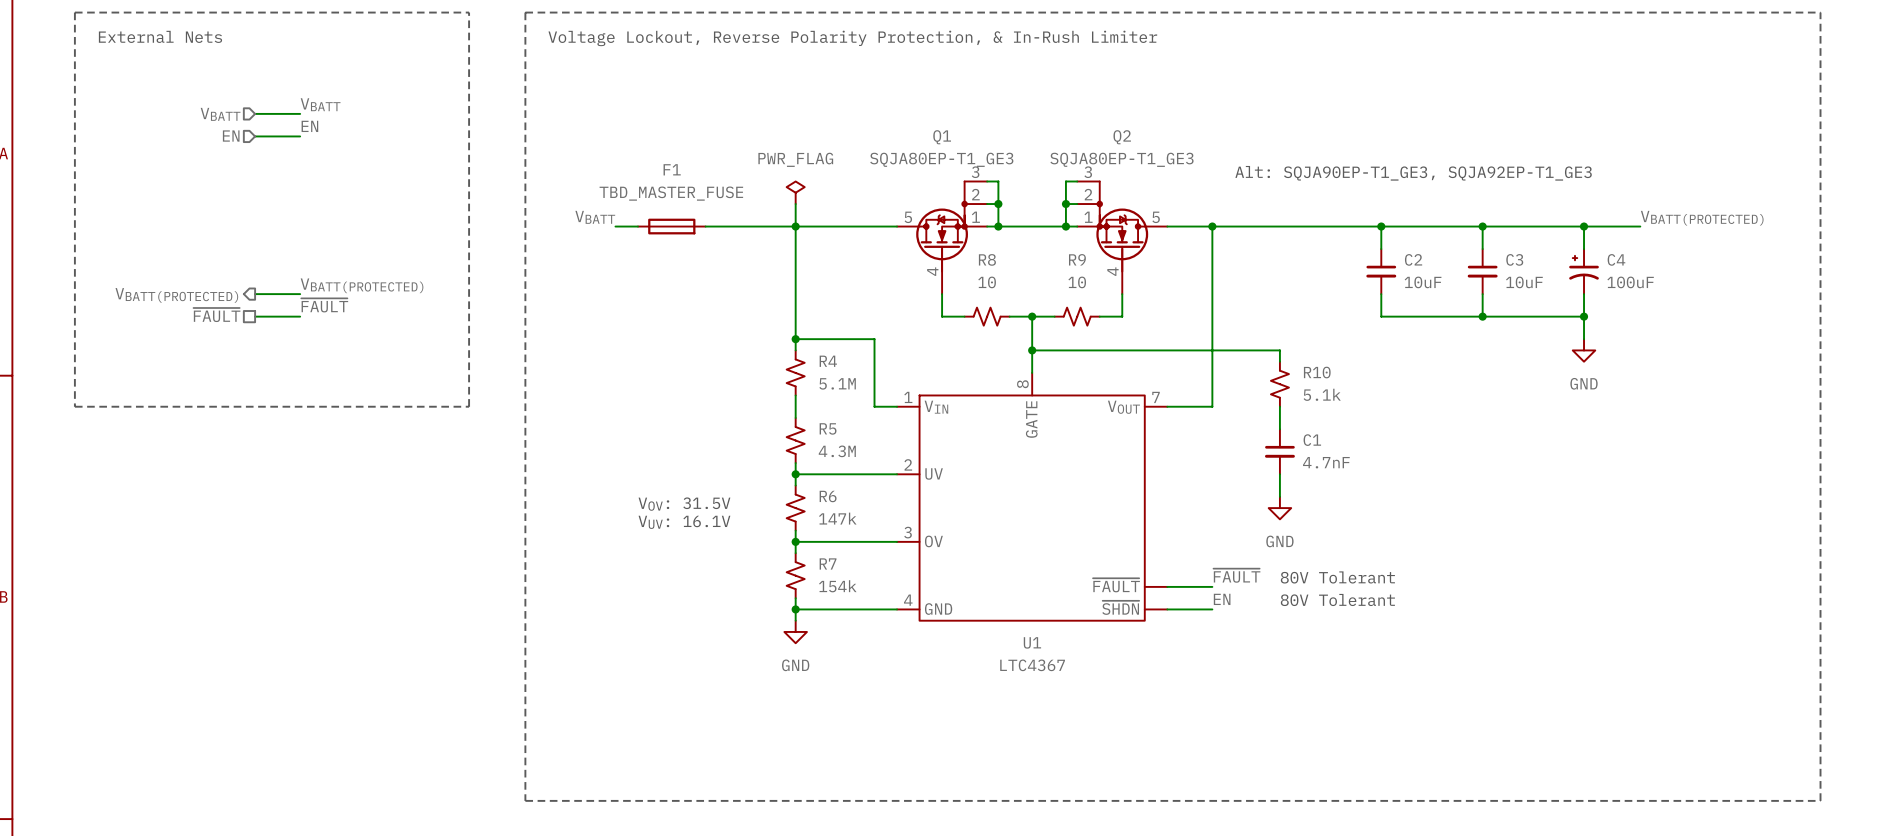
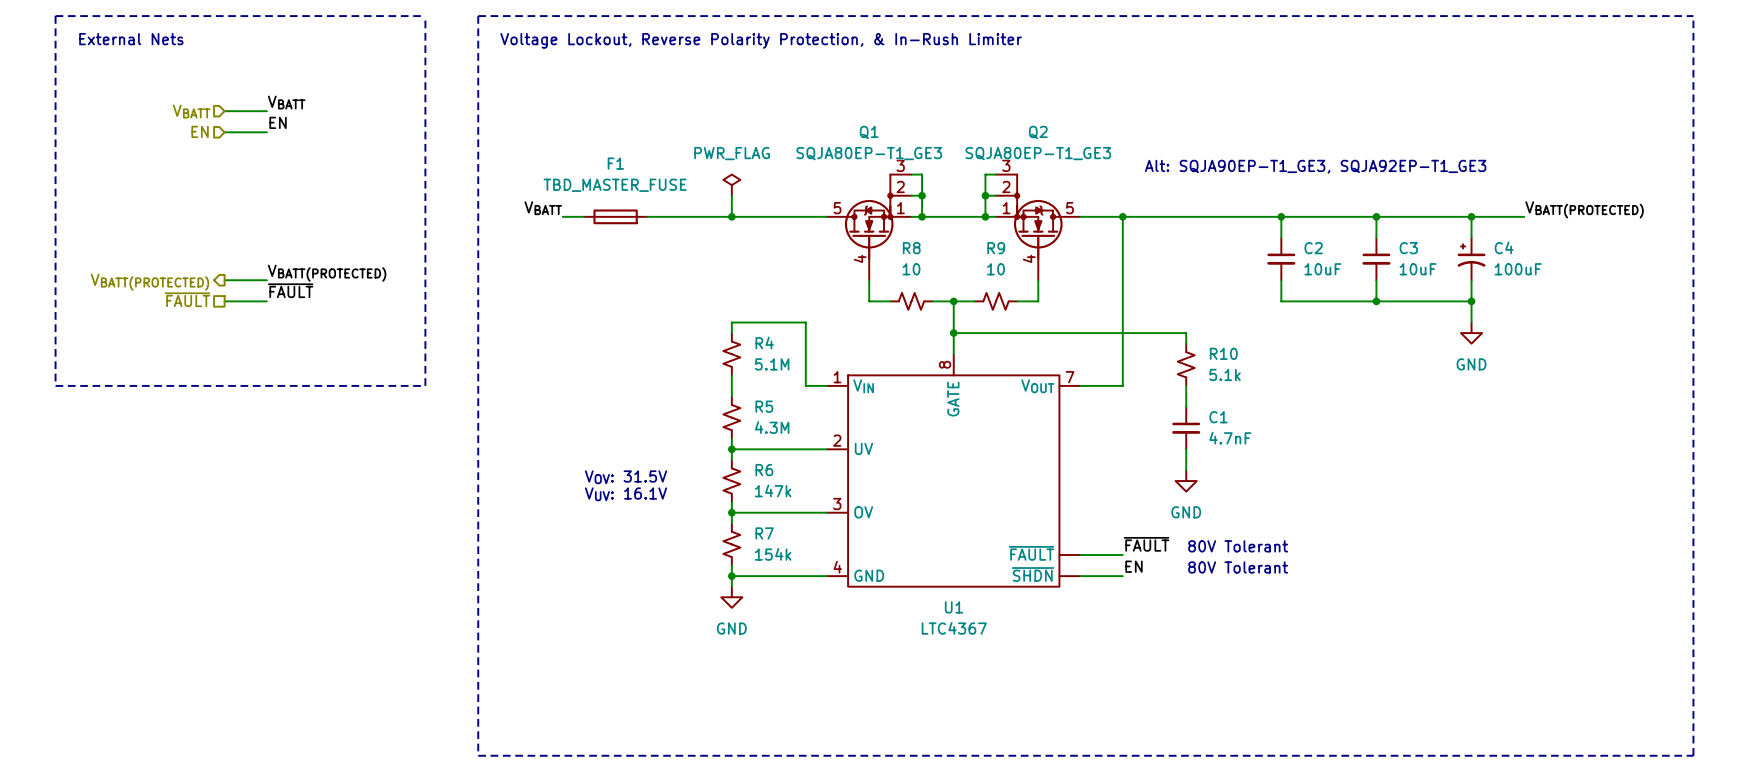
wire: (795, 226) (795, 339) -> none
junction: (795, 339) -> none

